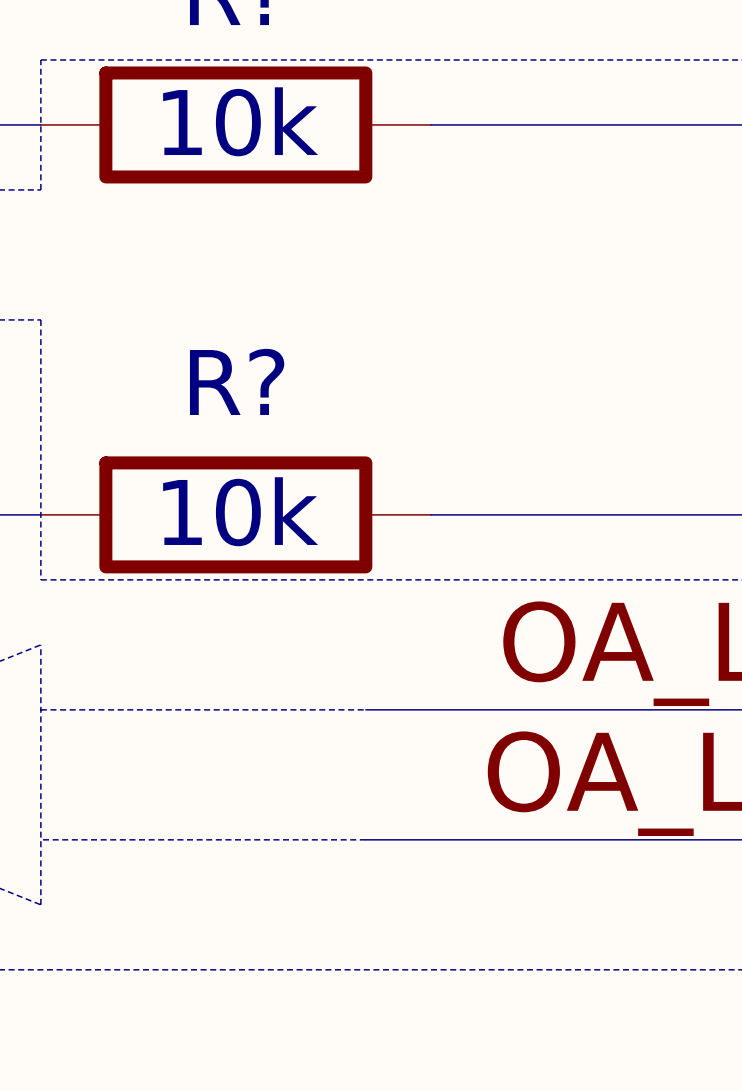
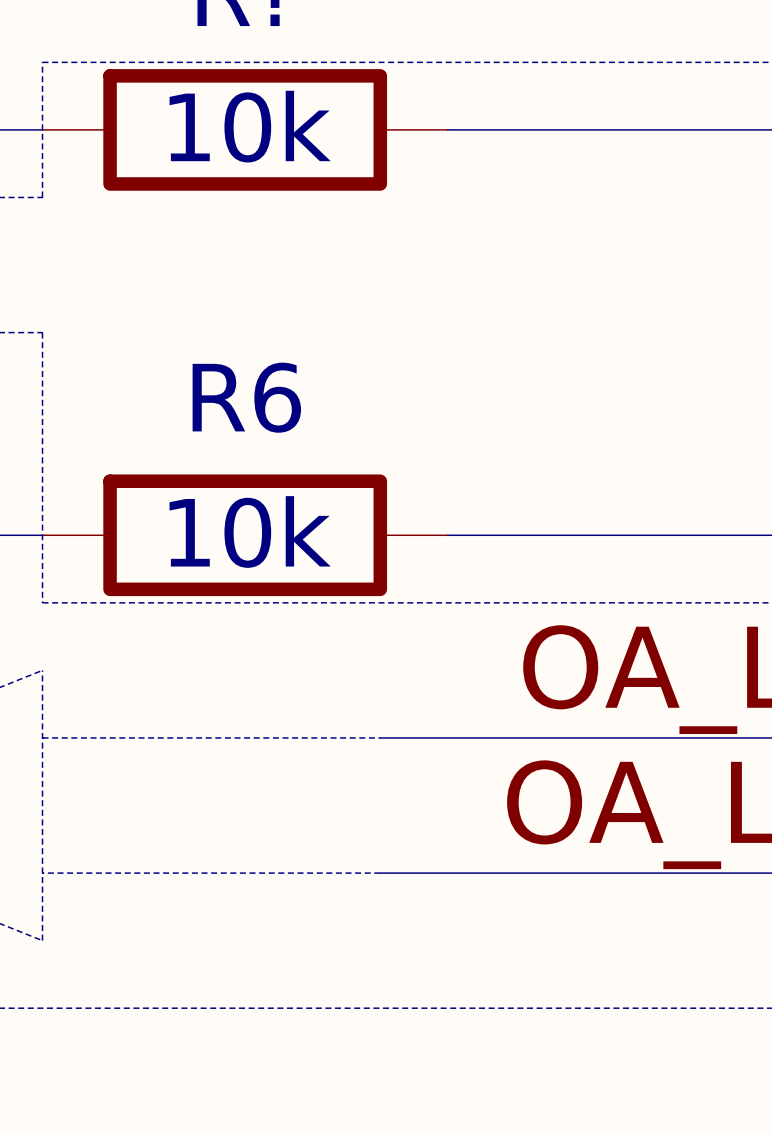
R? name: R? (237, 381) -> R6 (246, 397)

